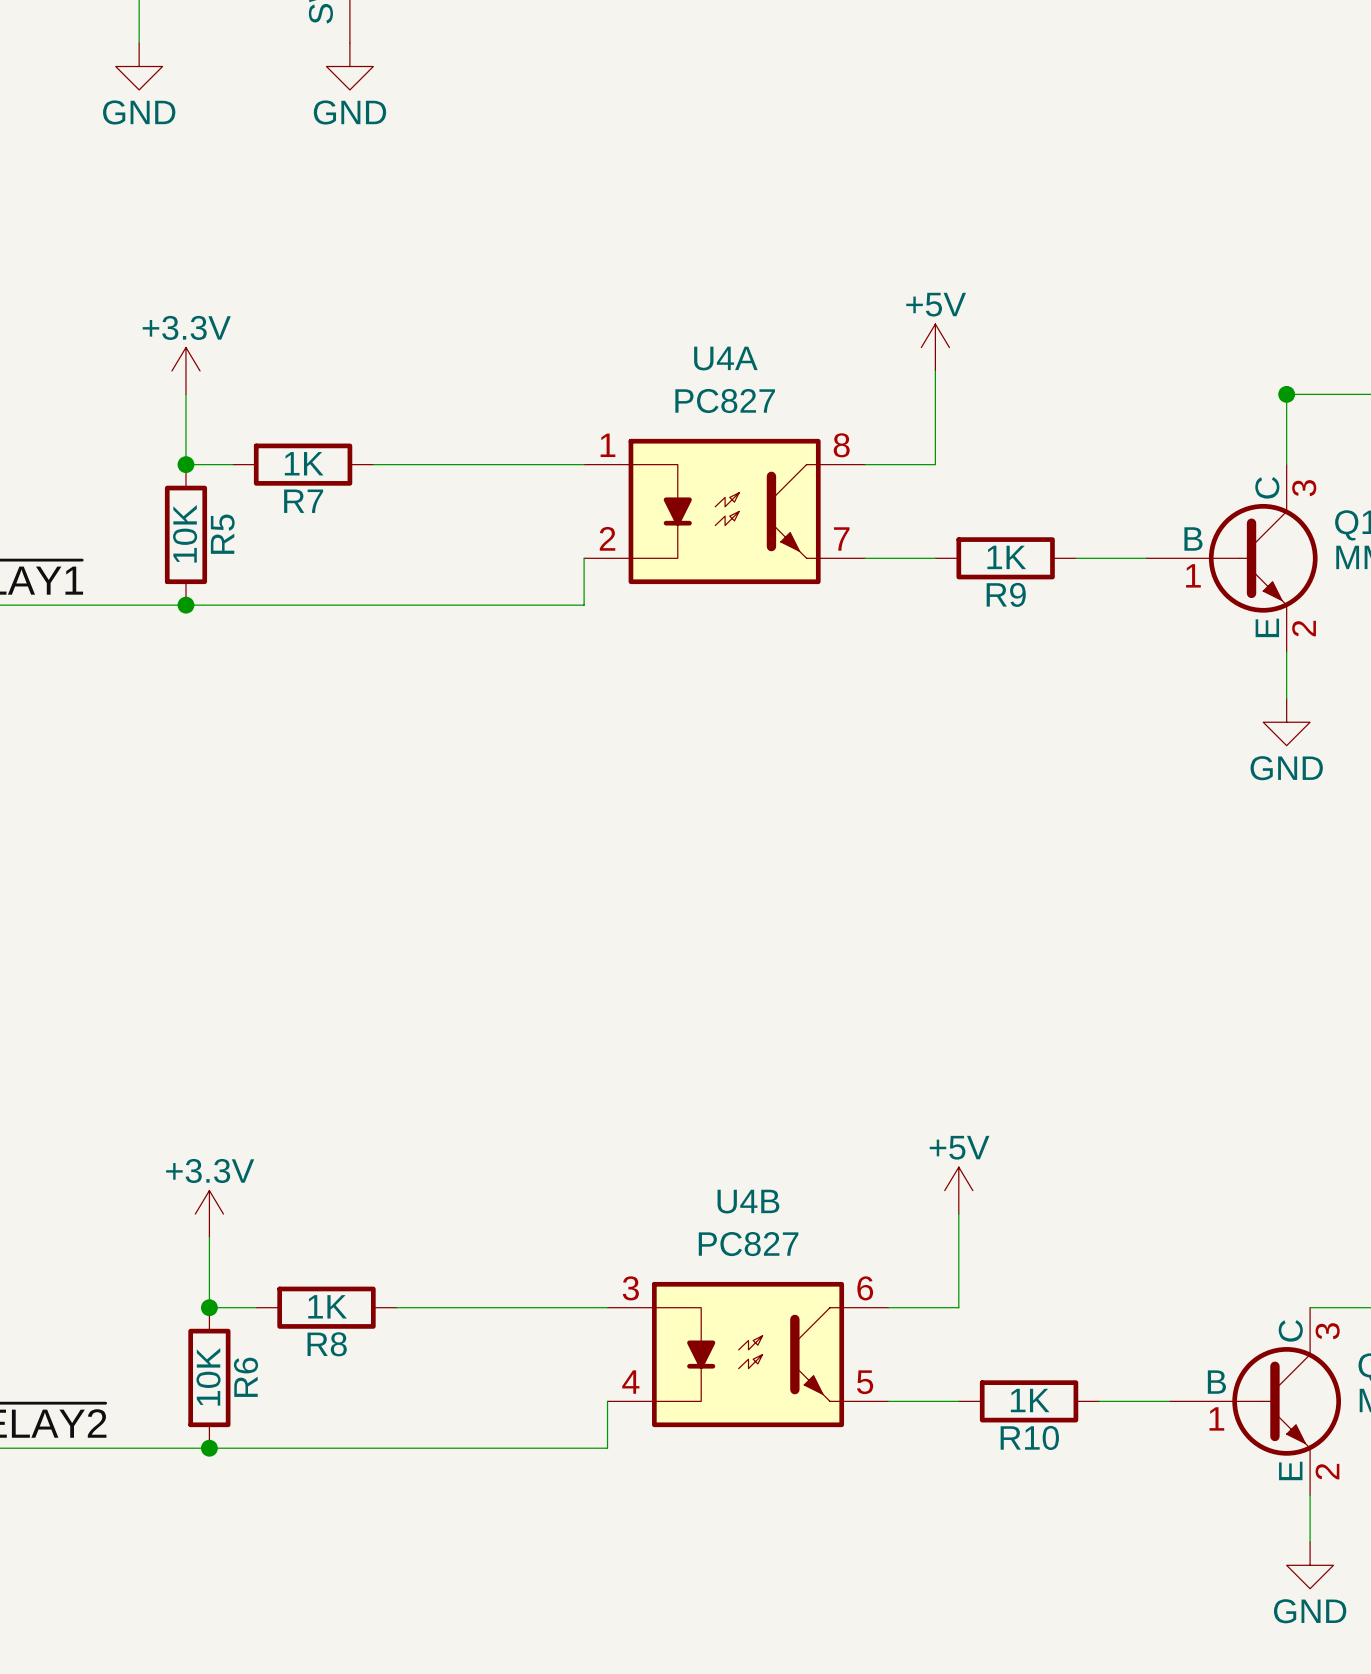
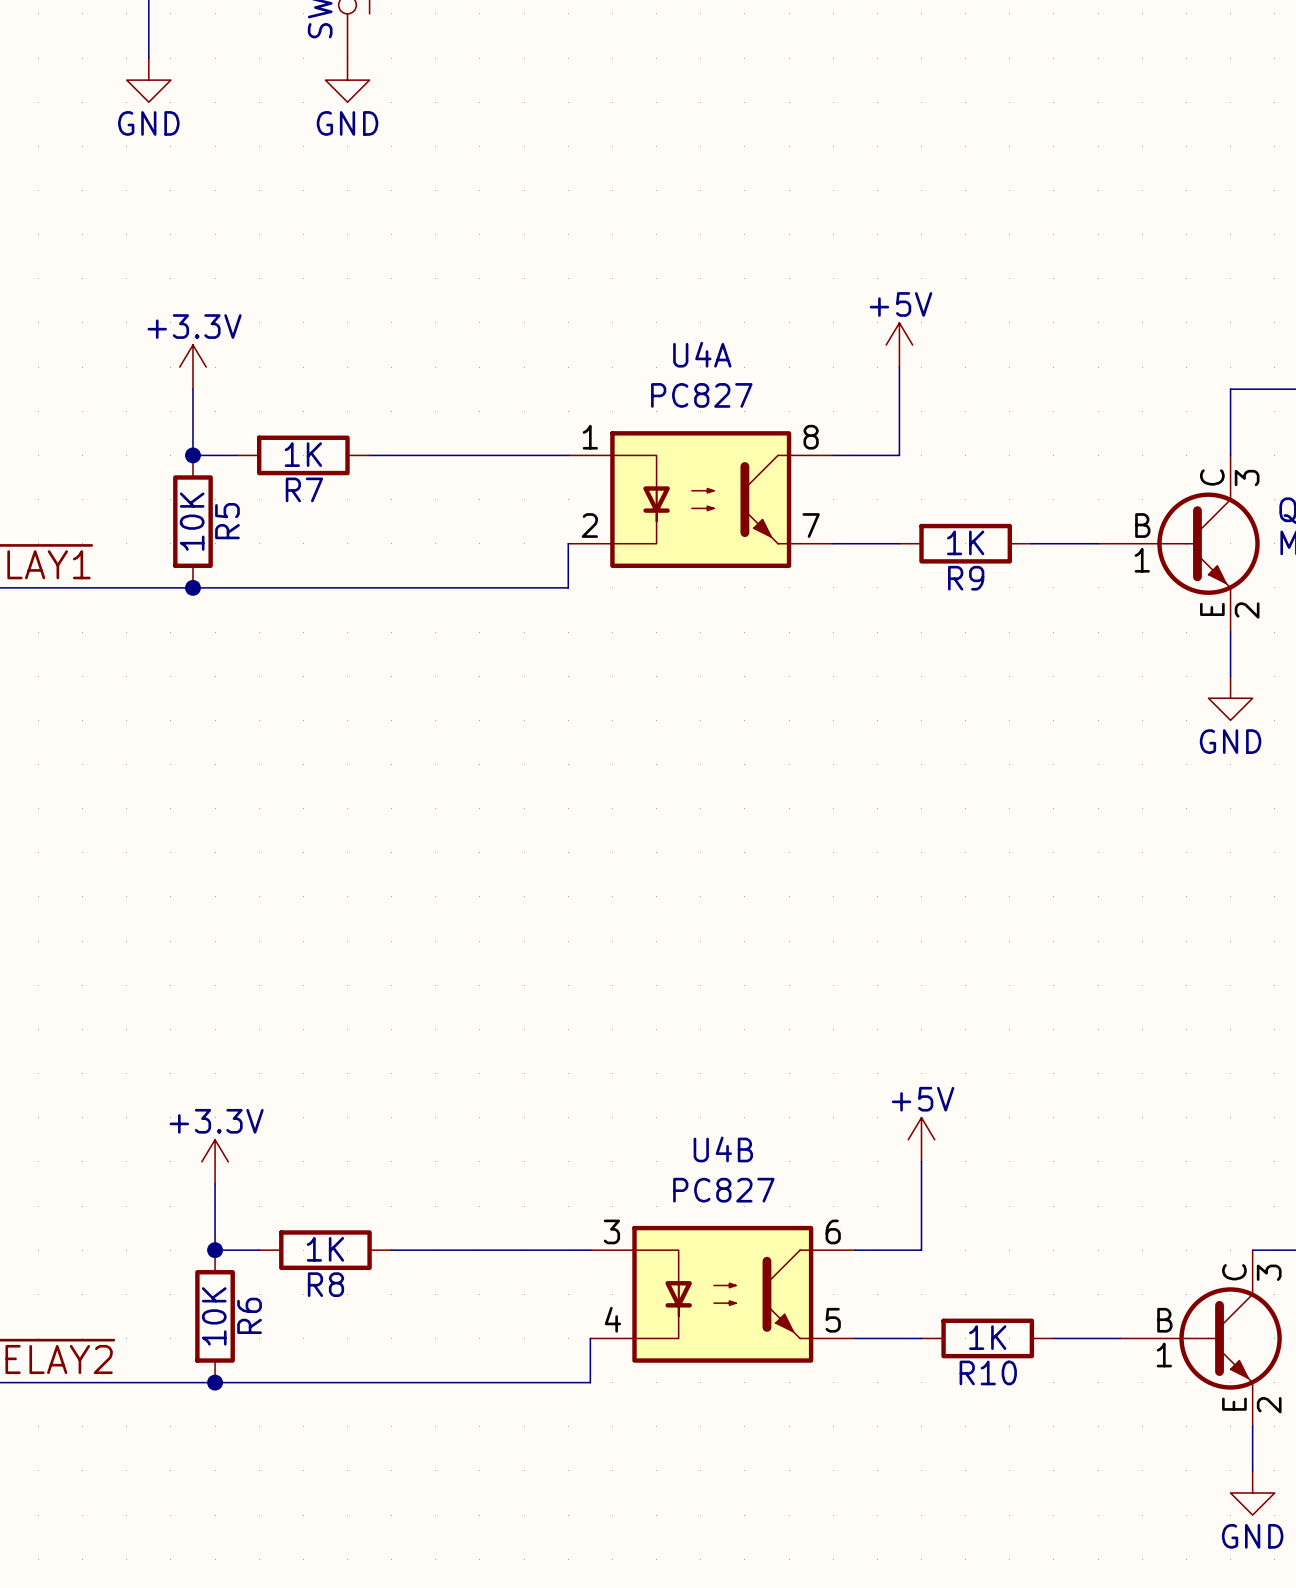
junction: (1286, 394) -> none
U4A symbol: [584, 438, 866, 585] -> [568, 431, 834, 569]
U4B symbol: [607, 1281, 889, 1428] -> [590, 1225, 856, 1363]

